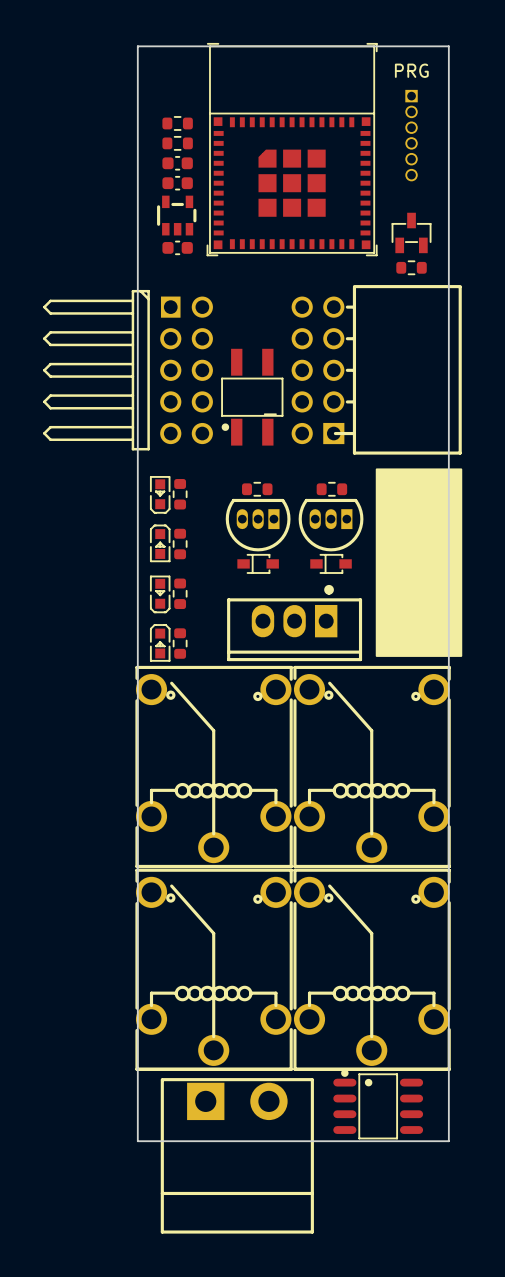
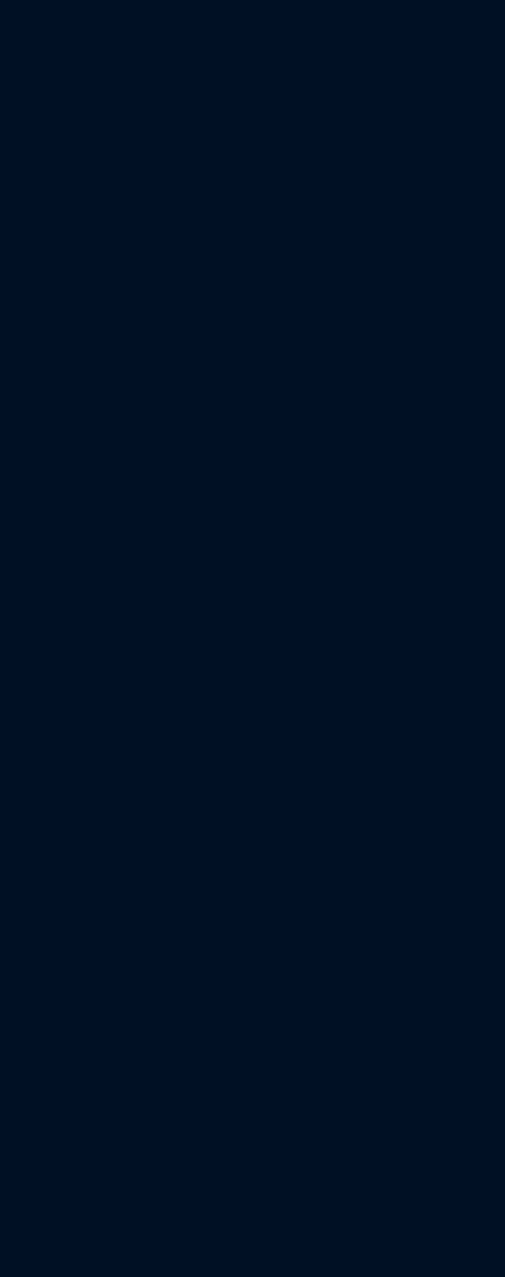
board edge: (137, 46) (448, 46) (448, 1141) (137, 1141) (137, 46) -> none
text: PRG (411, 70) -> none
part: (177, 123) -> none
part: (411, 135) -> none
part: (177, 143) -> none
part: (292, 149) -> none
part: (177, 163) -> none
part: (177, 183) -> none
part: (176, 215) -> none
part: (411, 232) -> none
part: (177, 247) -> none
part: (411, 267) -> none
part: (376, 369) -> none
part: (128, 370) -> none
part: (252, 397) -> none
drawing: [375, 468, 463, 657] -> none
part: (257, 489) -> none
part: (331, 489) -> none
part: (160, 494) -> none
part: (180, 494) -> none
part: (258, 525) -> none
part: (331, 525) -> none
part: (160, 543) -> none
part: (180, 544) -> none
part: (258, 563) -> none
part: (331, 563) -> none
part: (180, 593) -> none
part: (160, 594) -> none
part: (294, 623) -> none
part: (160, 642) -> none
part: (180, 643) -> none
part: (214, 766) -> none
part: (372, 766) -> none
part: (214, 969) -> none
part: (372, 969) -> none
part: (378, 1104) -> none
part: (237, 1155) -> none

